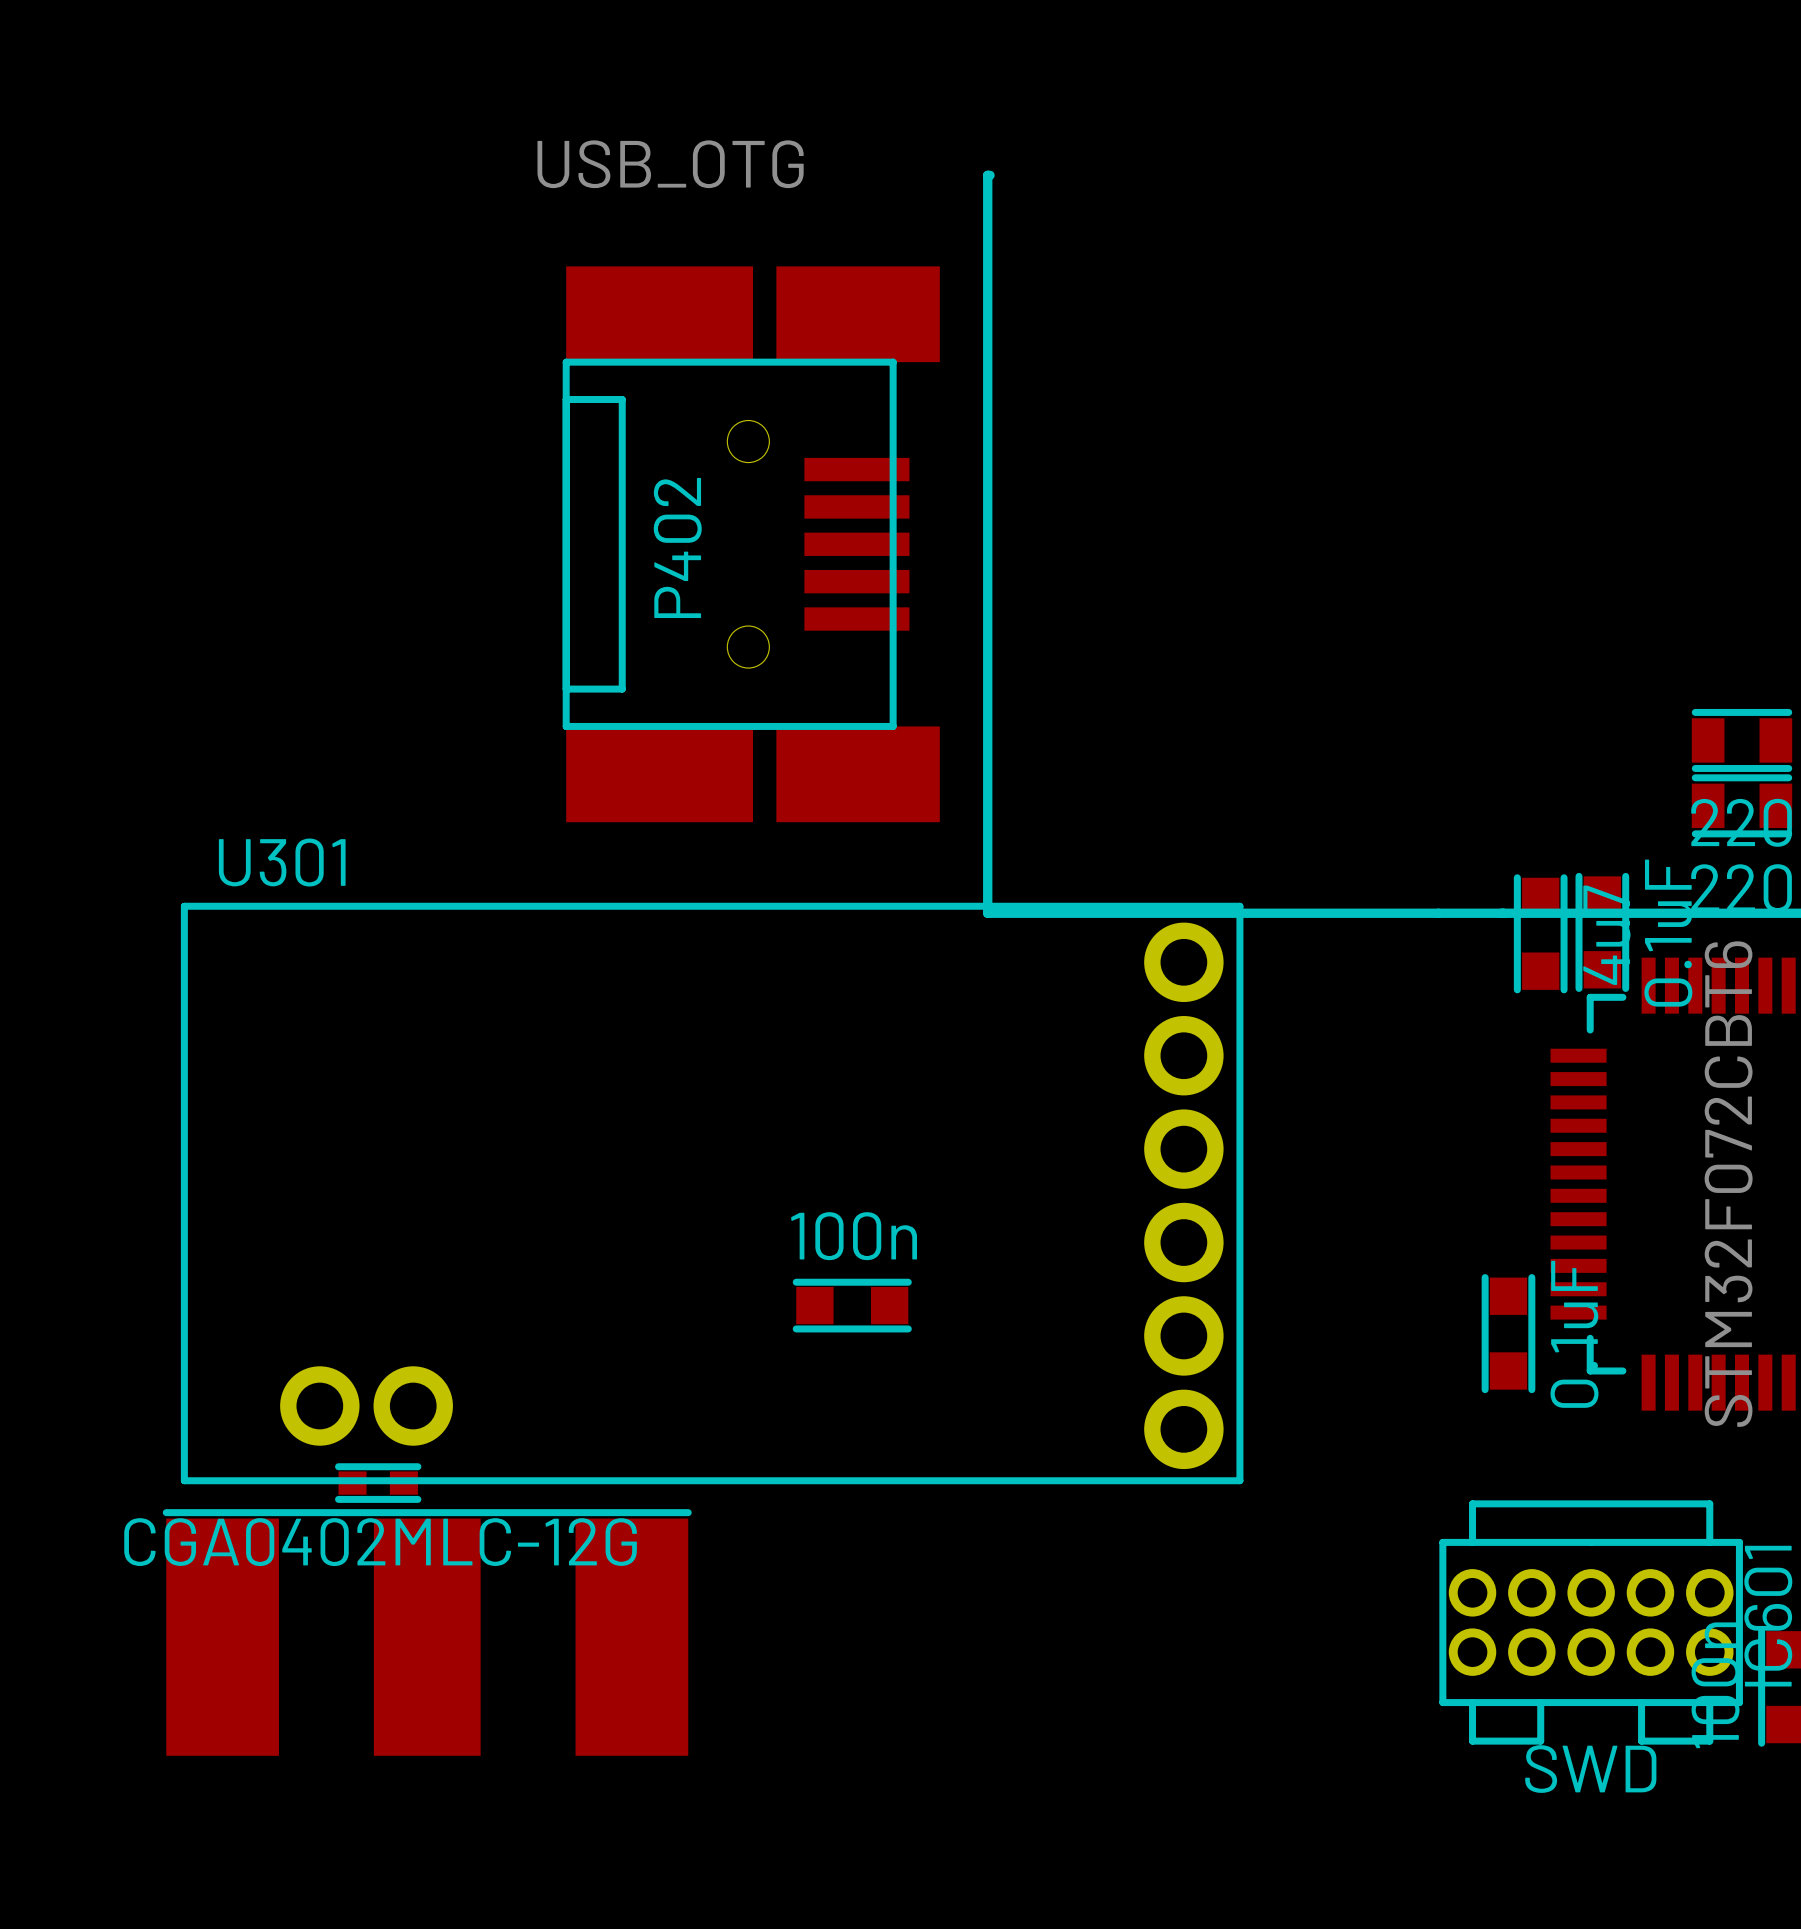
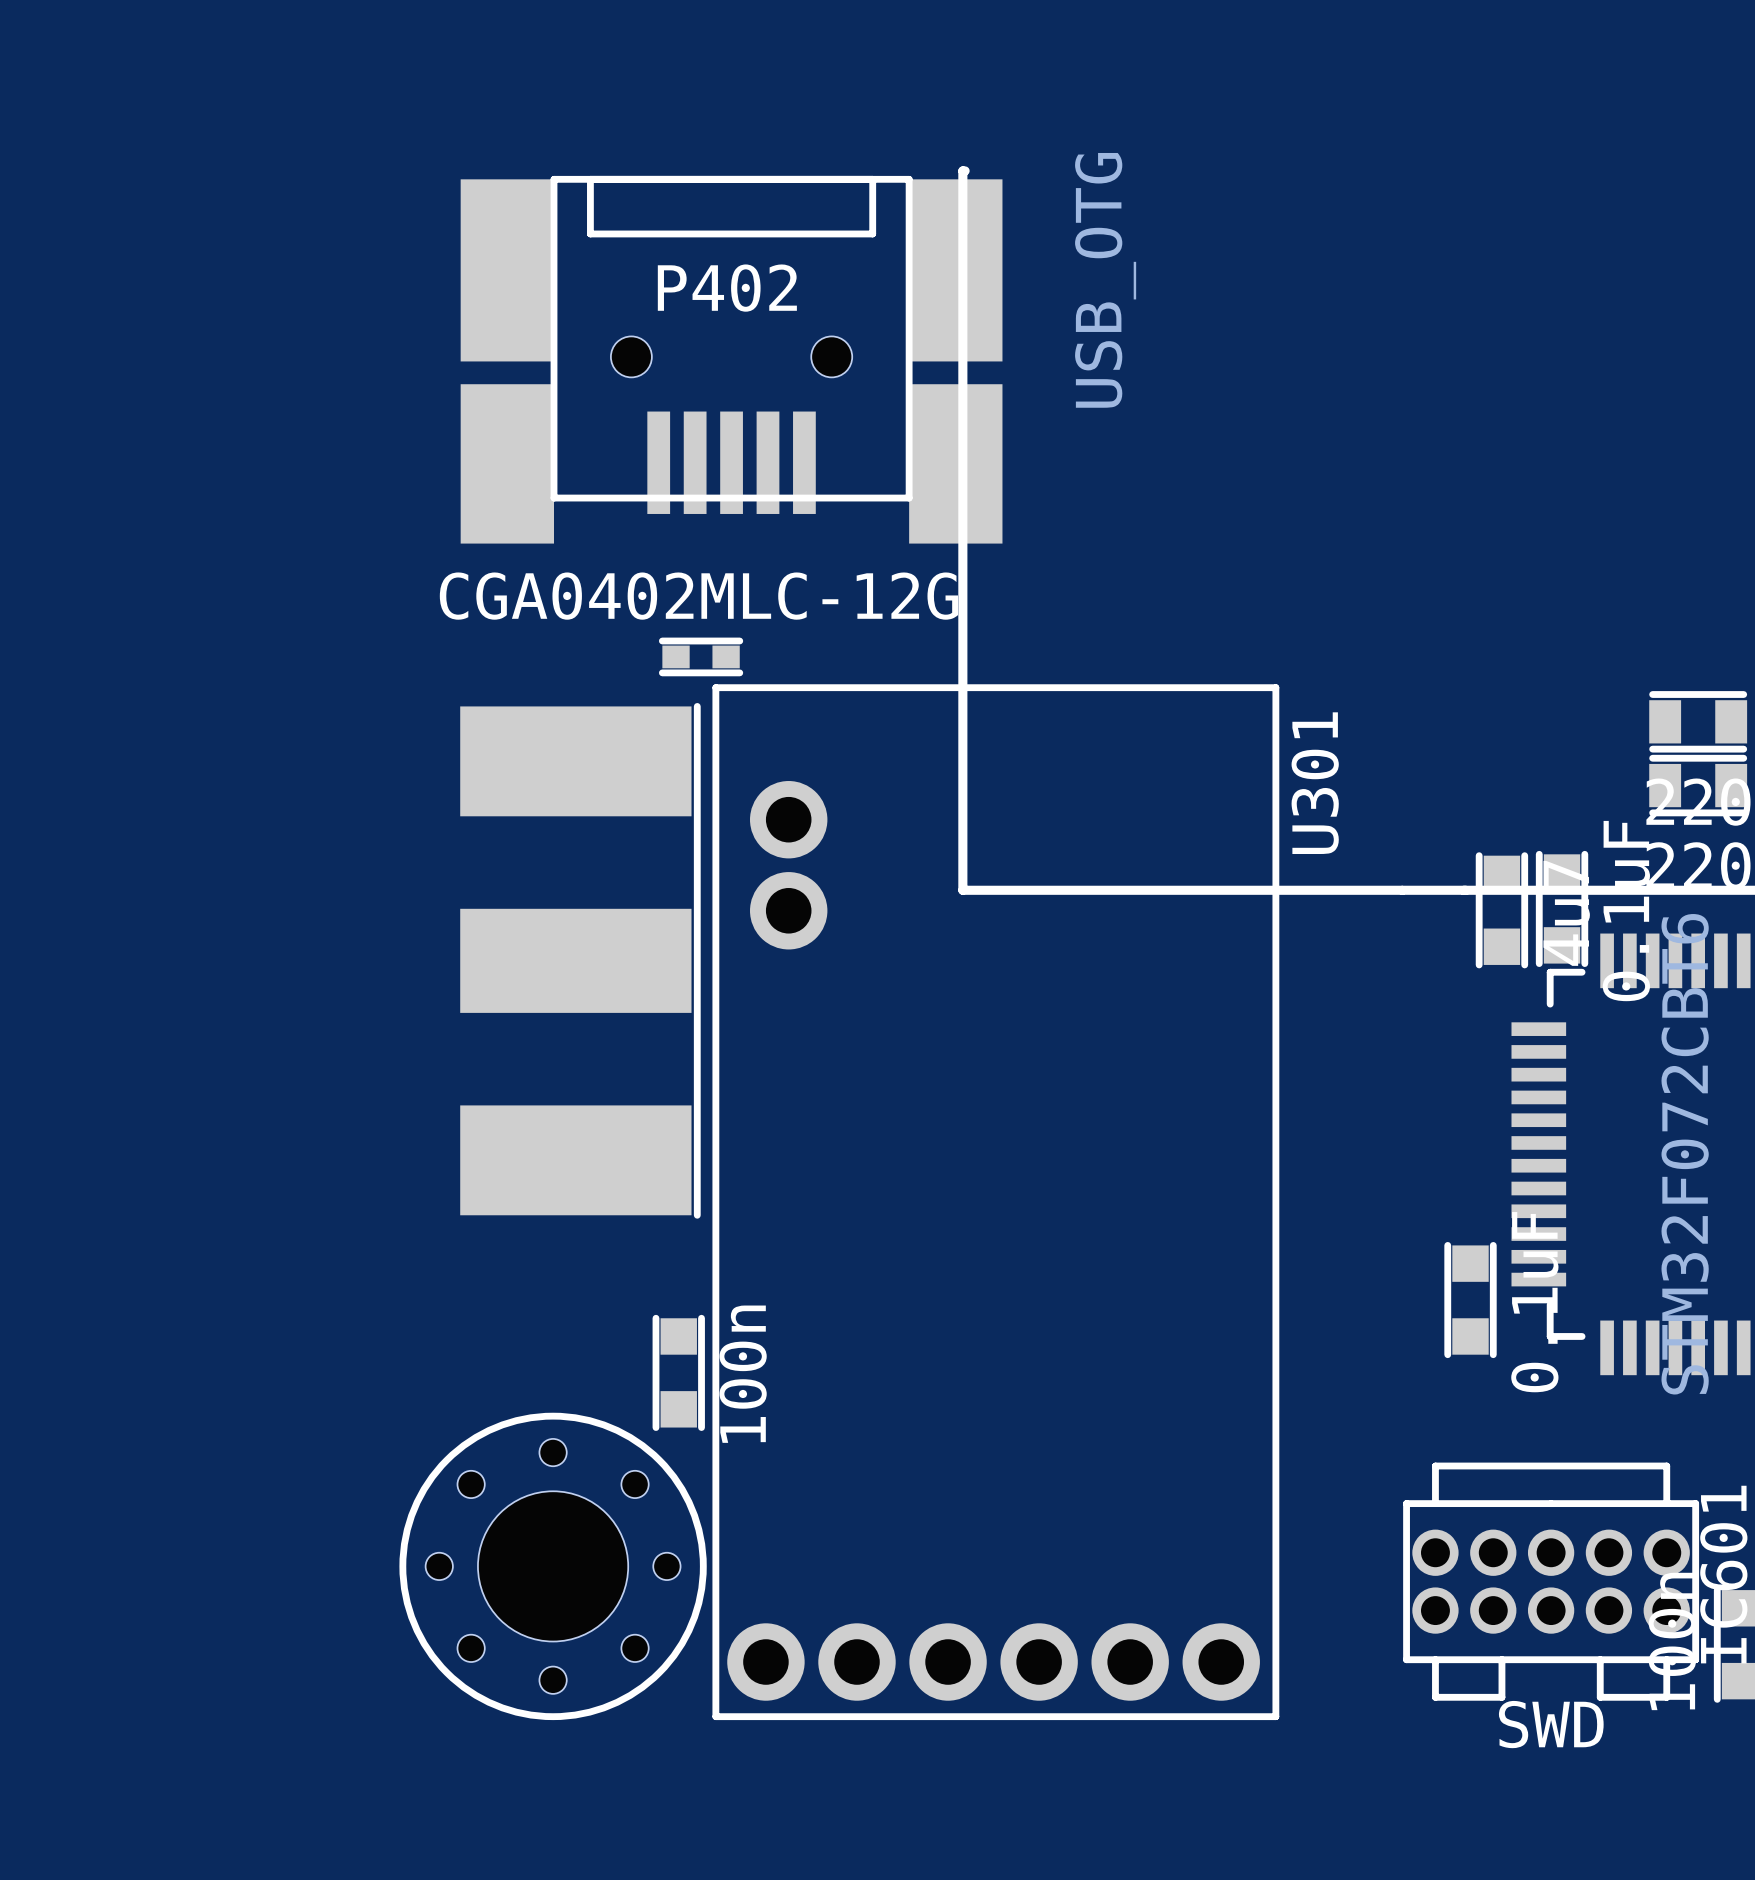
P402 rotation: 0° (751, 544) -> 90° clockwise (731, 359)
U301 rotation: 0° (712, 1193) -> 90° clockwise (995, 1202)
part rotation: 0° (852, 1305) -> 90° clockwise (678, 1372)
part position: (852, 1305) -> (678, 1372)
part position: (378, 1483) -> (701, 656)
part value position: CGA0402MLC-12G (380, 1542) -> CGA0402MLC-12G (698, 596)
part: none -> (553, 1566)
part rotation: 0° (427, 1632) -> 90° clockwise (580, 960)
part position: (427, 1632) -> (580, 960)

